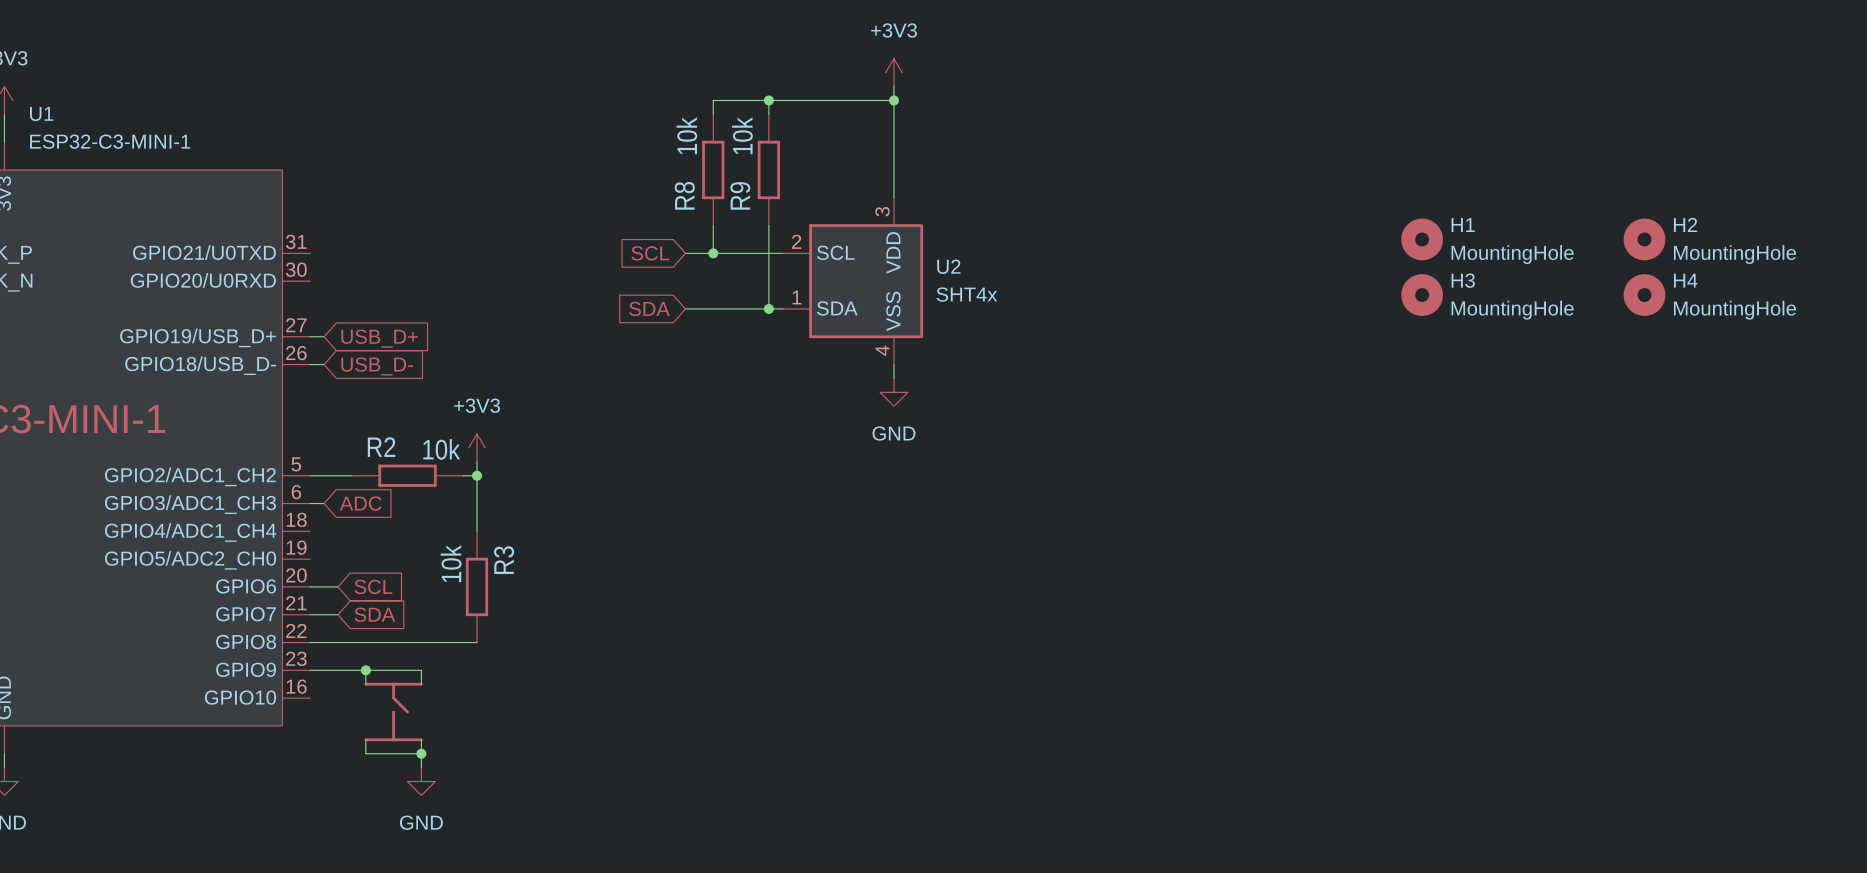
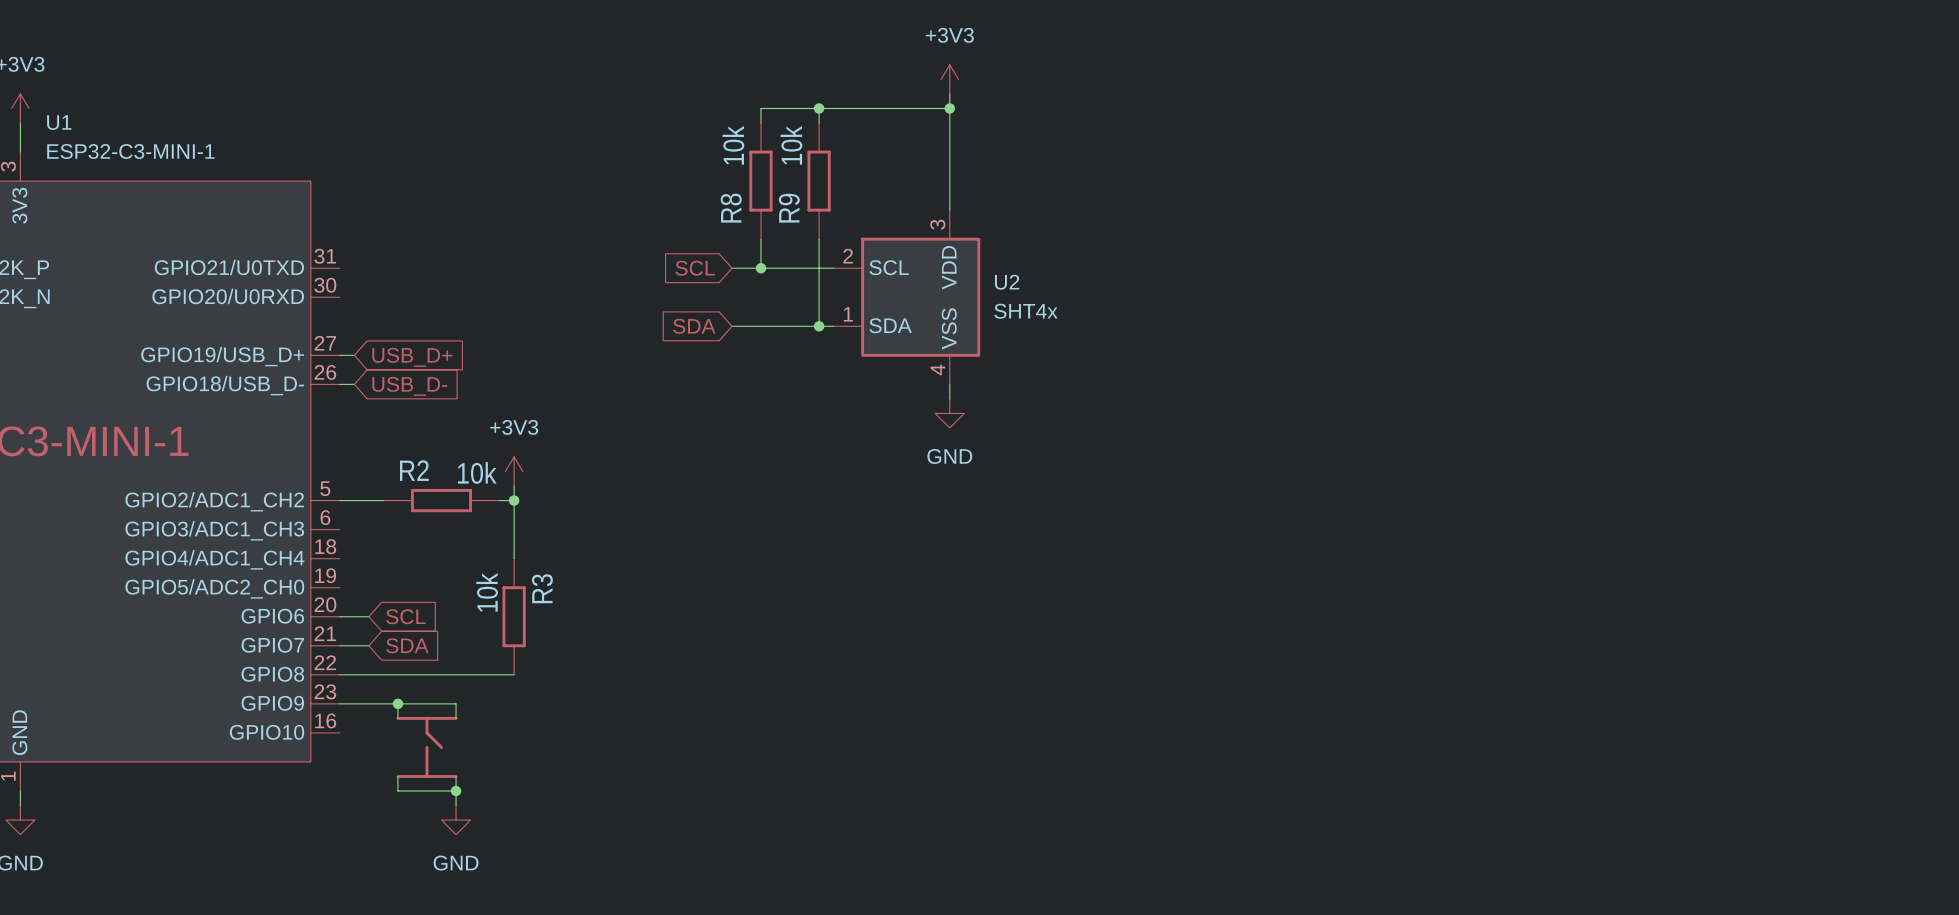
H1: MountingHole (1422, 239) -> none
H2: MountingHole (1644, 239) -> none
H3: MountingHole (1422, 295) -> none
H4: MountingHole (1644, 295) -> none
wire: (310, 503) (324, 503) -> none
global label: ADC (360, 503) -> none

